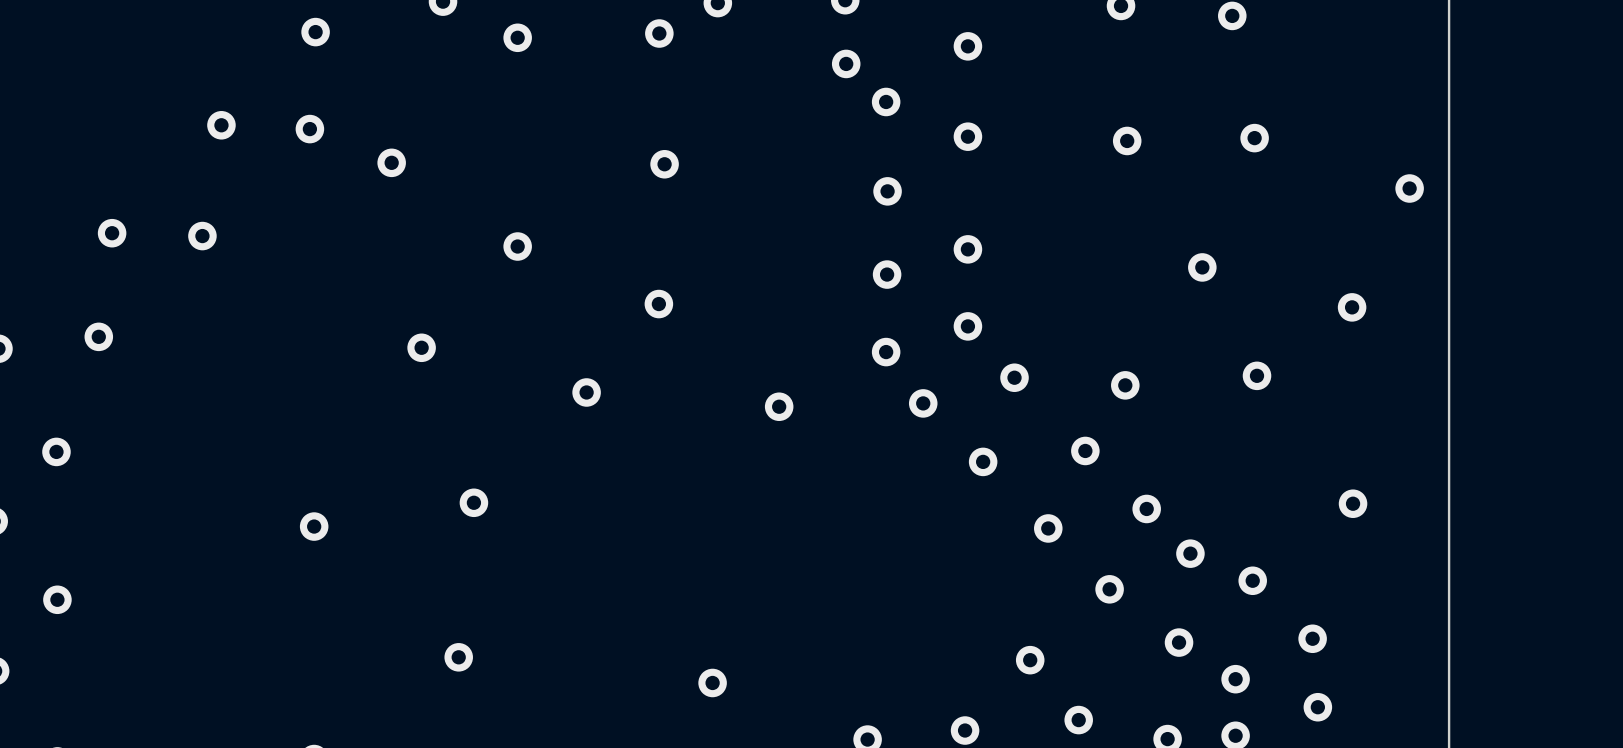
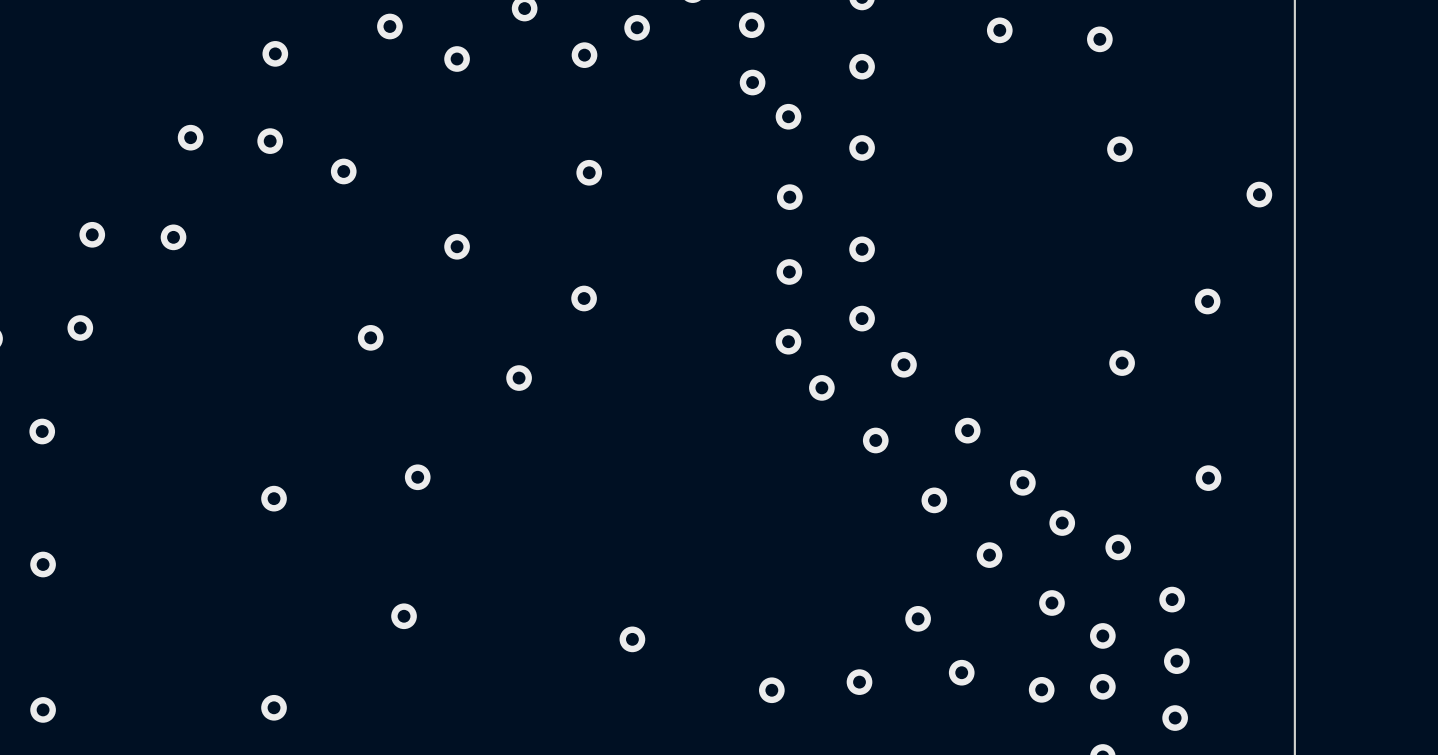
via: (1127, 140) -> none
via: (1202, 267) -> none
via: (1125, 385) -> none
via: (779, 406) -> none

